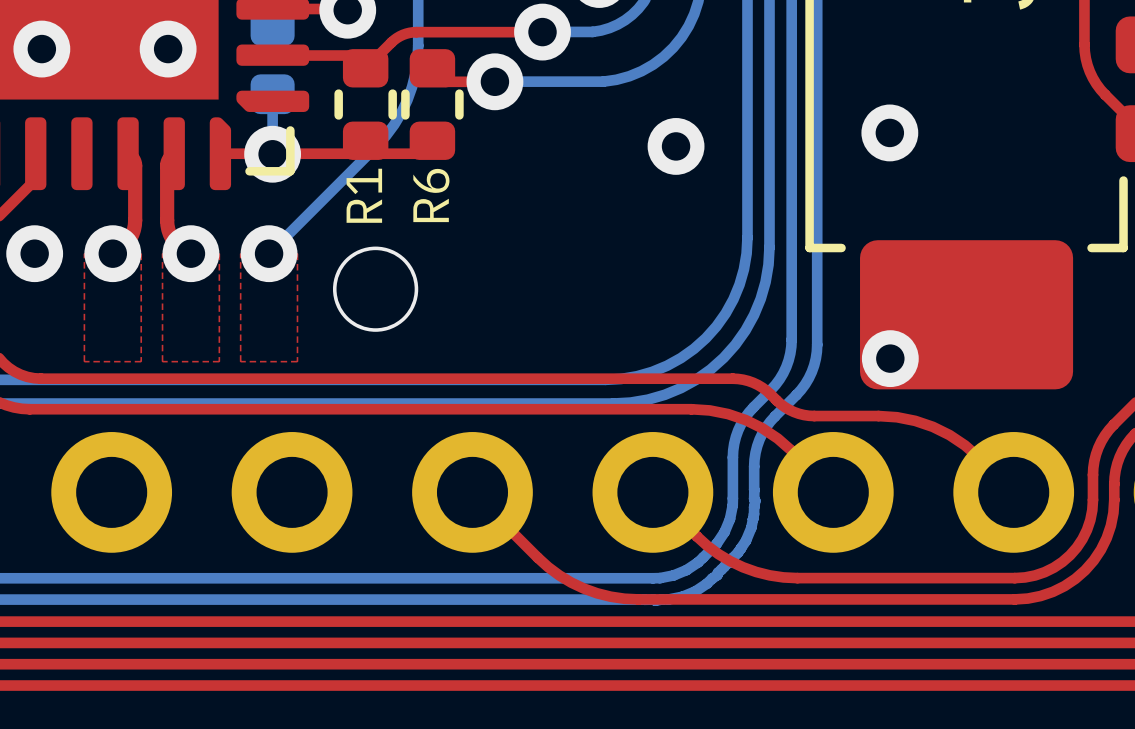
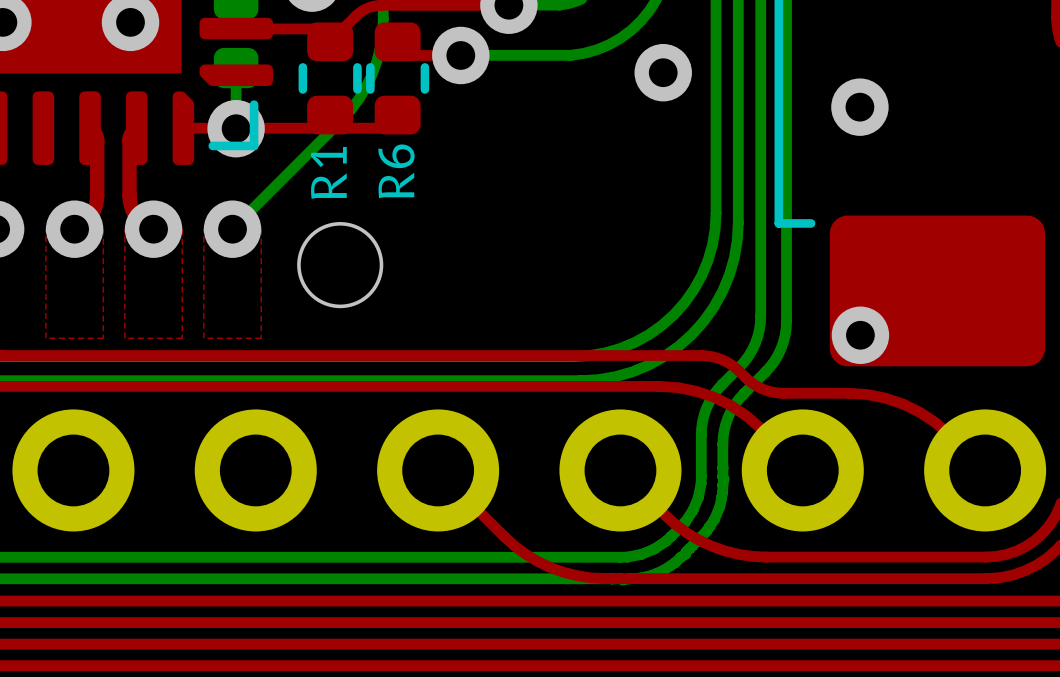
via position: (676, 146) -> (663, 72)

